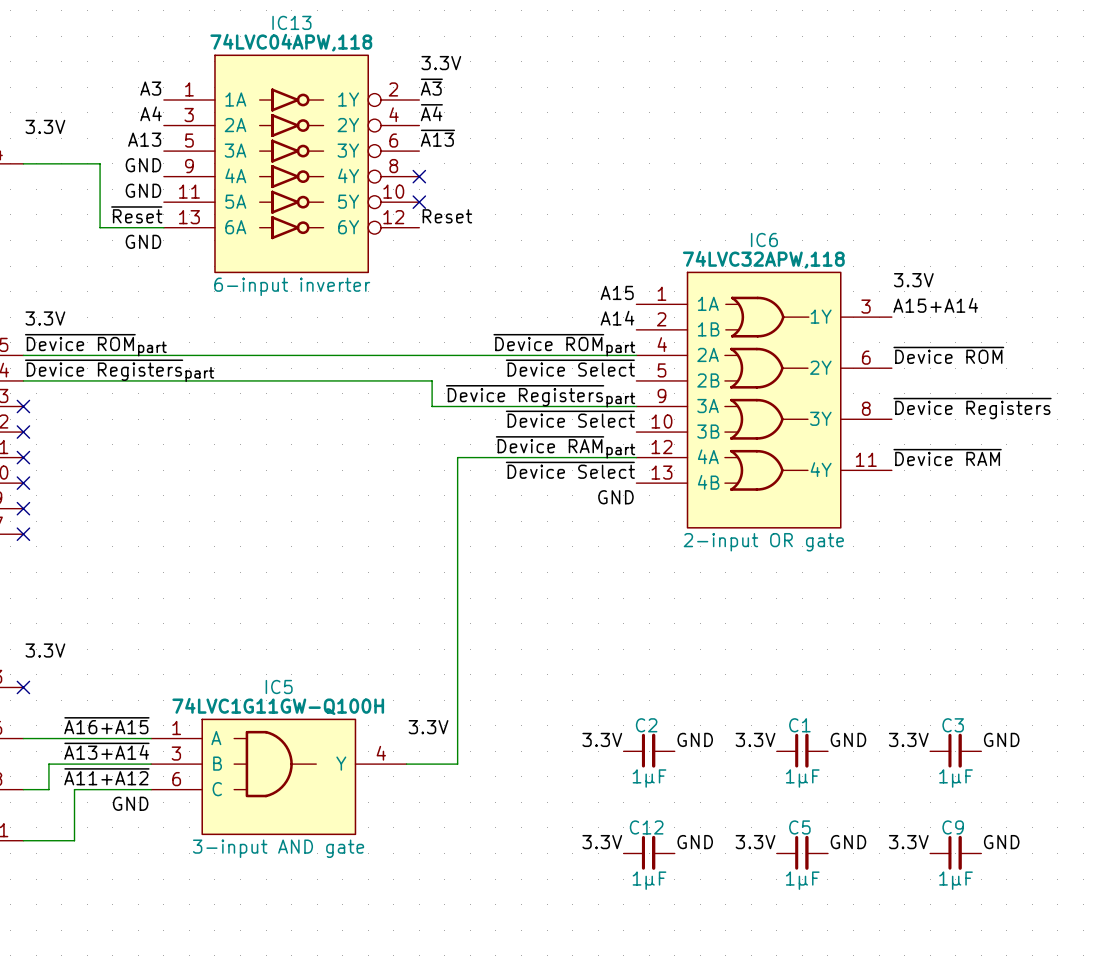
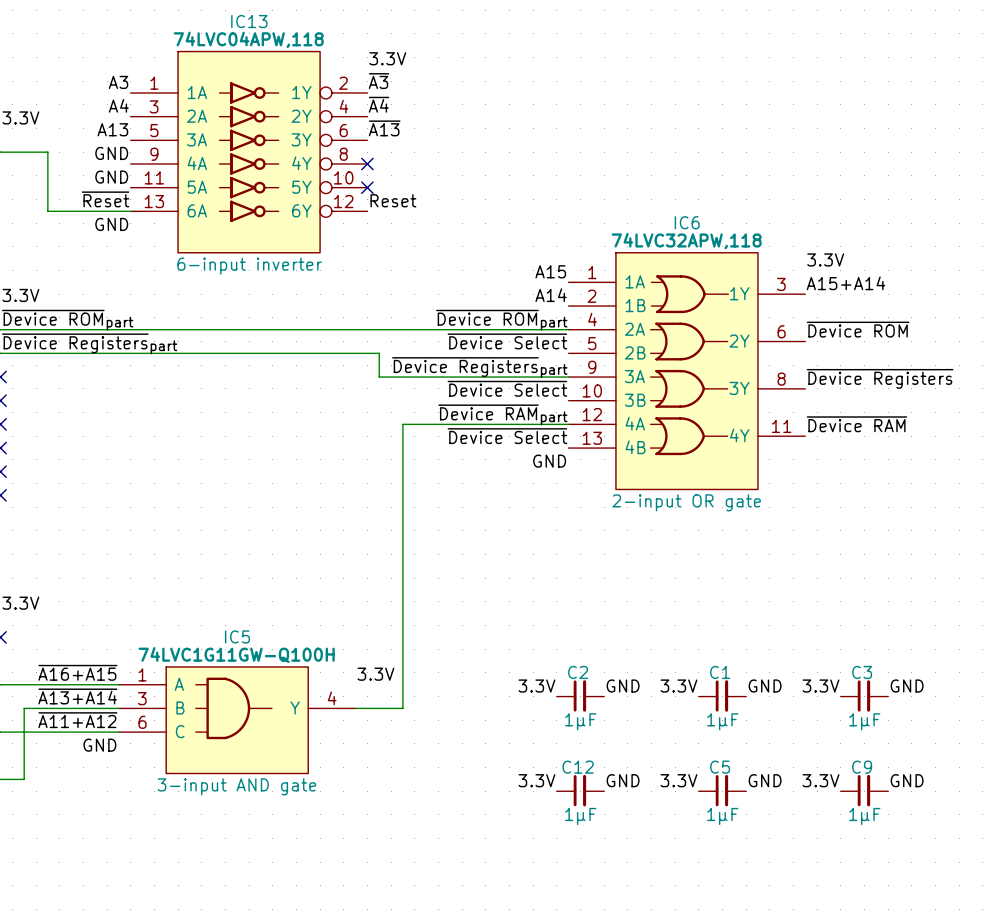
wire: (74, 163) (100, 163) (100, 227) -> (47, 152) (47, 211) (71, 211)
wire: (74, 789) (74, 840) (48, 840) -> (47, 732) (24, 732) (24, 779)

